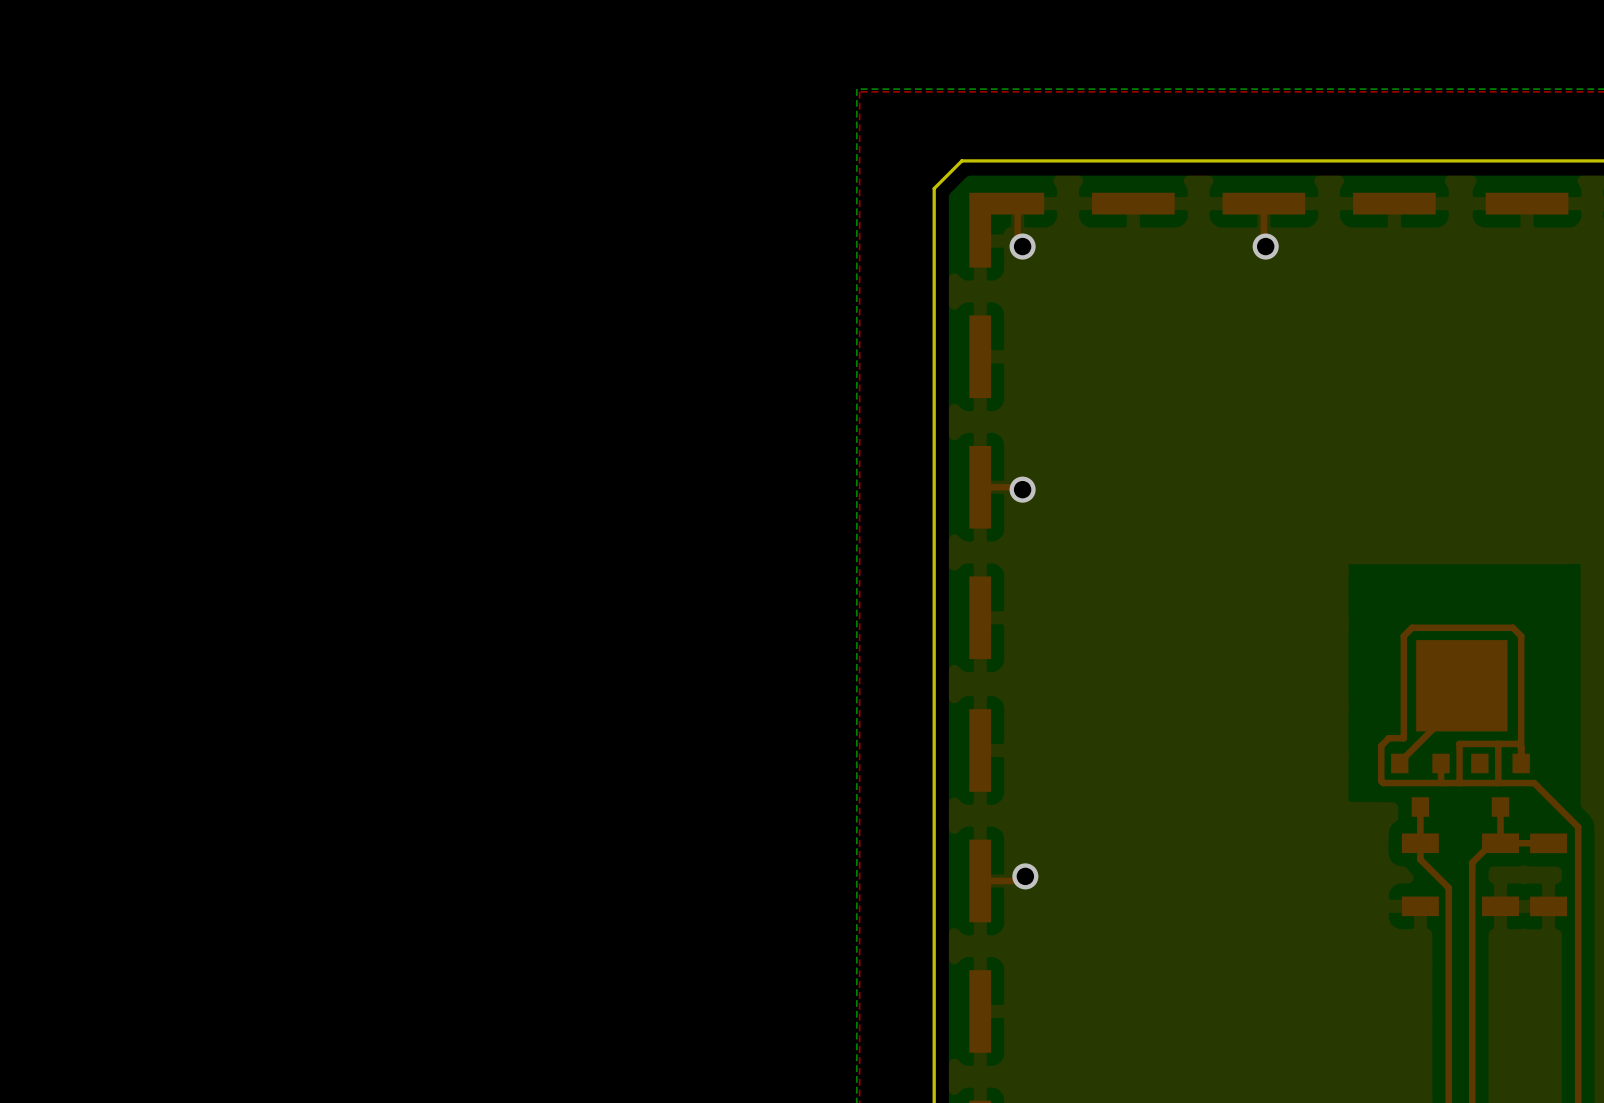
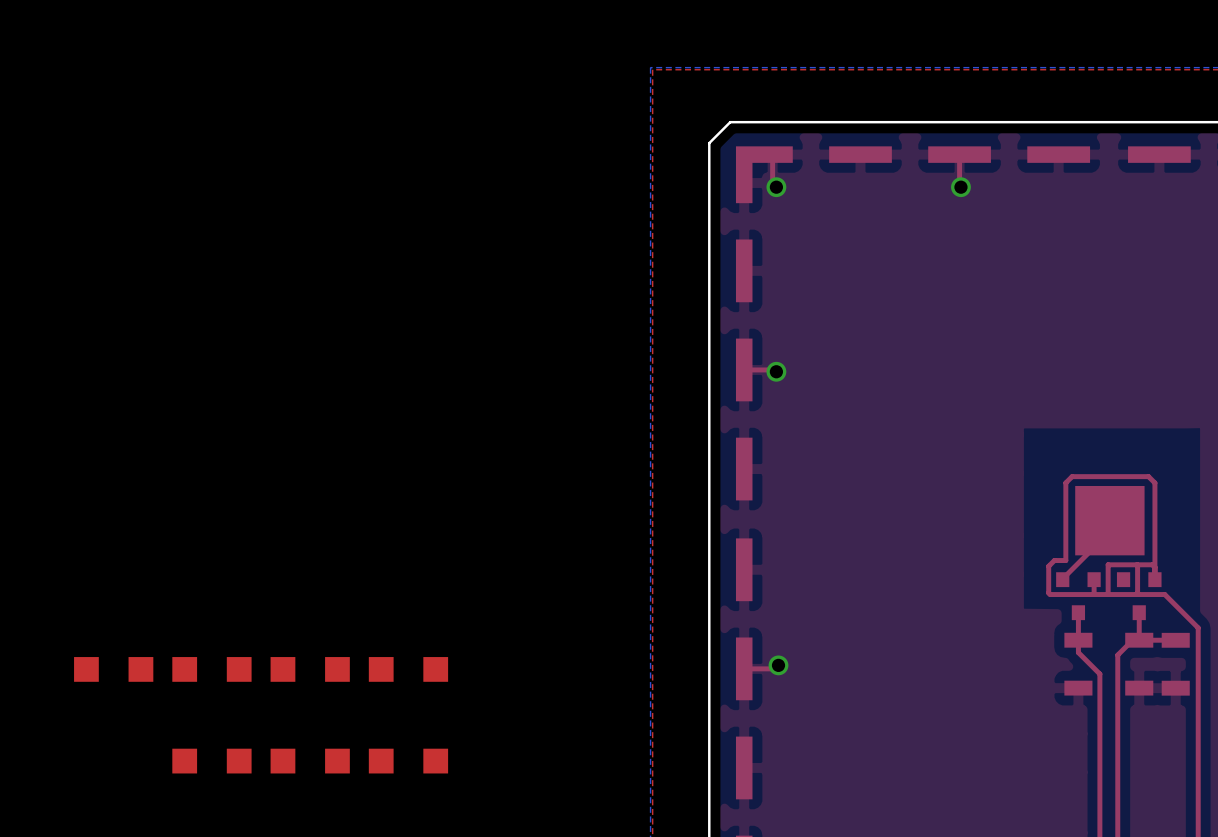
part: none -> (113, 669)
part: none -> (211, 669)
part: none -> (310, 669)
part: none -> (408, 669)
part: none -> (211, 761)
part: none -> (310, 761)
part: none -> (408, 761)

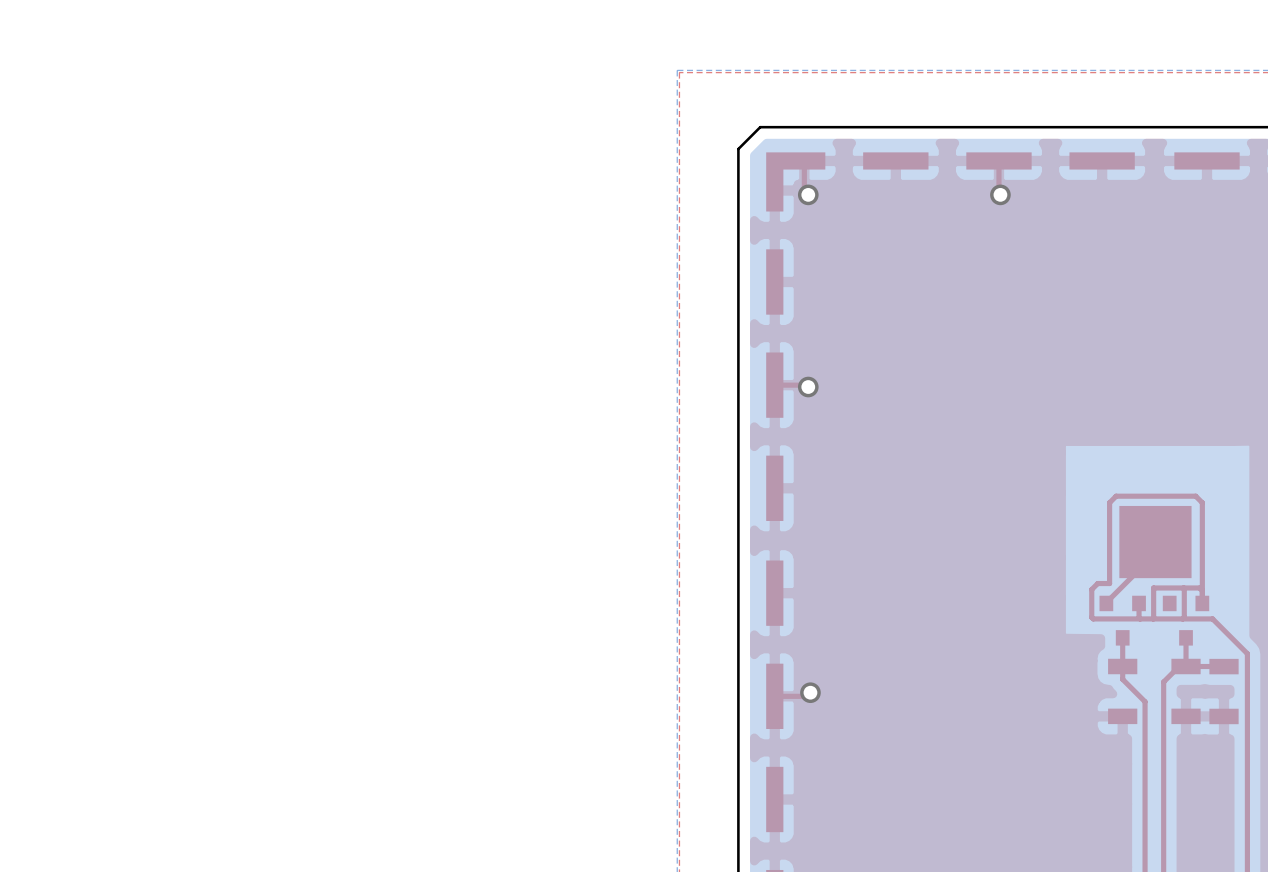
part: (113, 669) -> none
part: (211, 669) -> none
part: (310, 669) -> none
part: (408, 669) -> none
part: (211, 761) -> none
part: (310, 761) -> none
part: (408, 761) -> none

